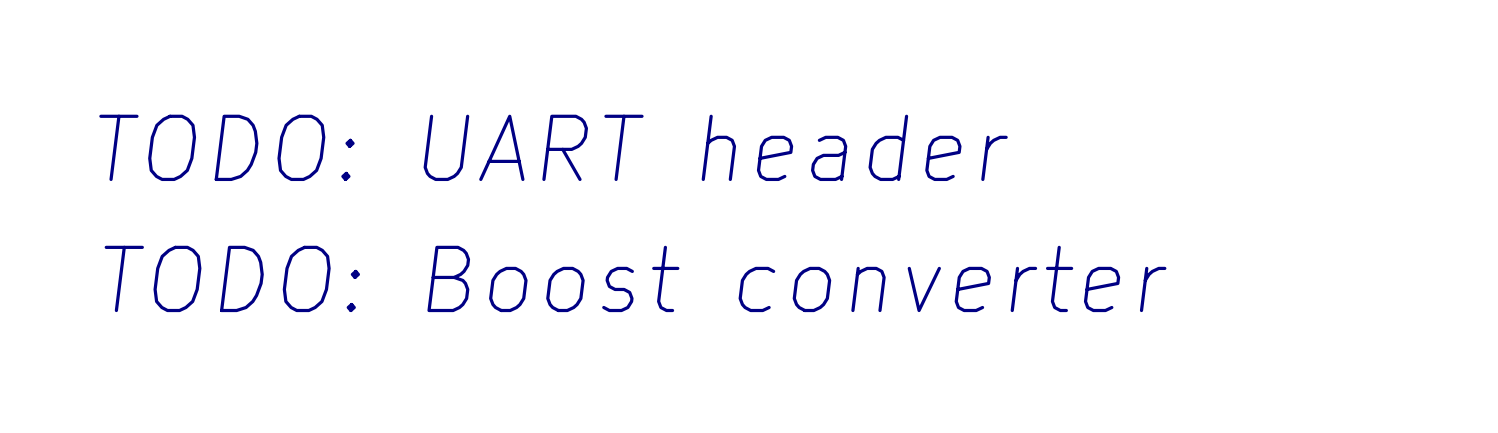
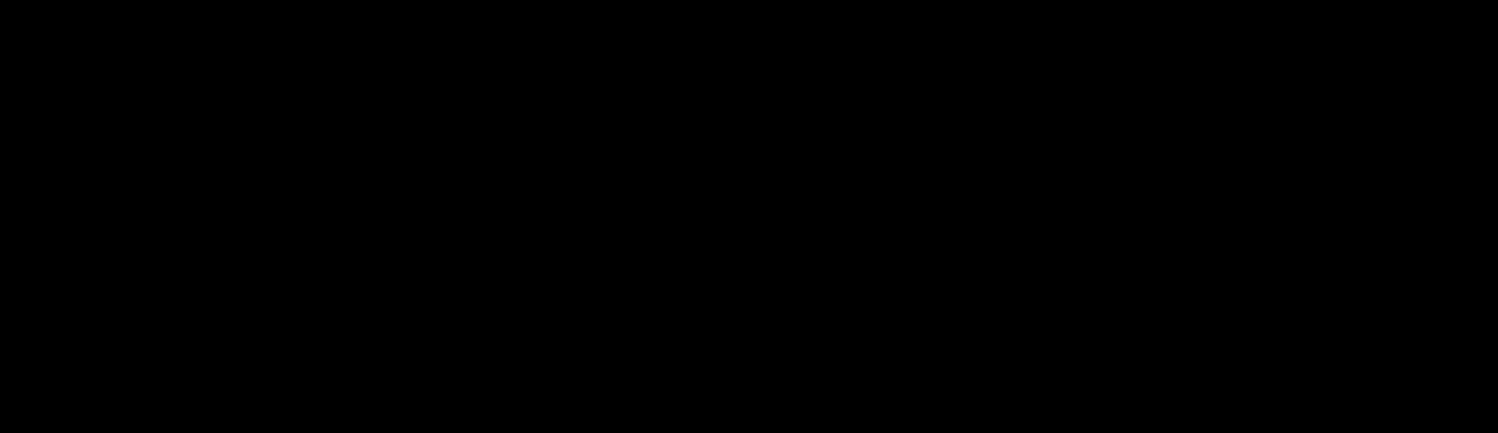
text: TODO: UART header (553, 147) -> none
text: TODO: Boost converter (635, 278) -> none

